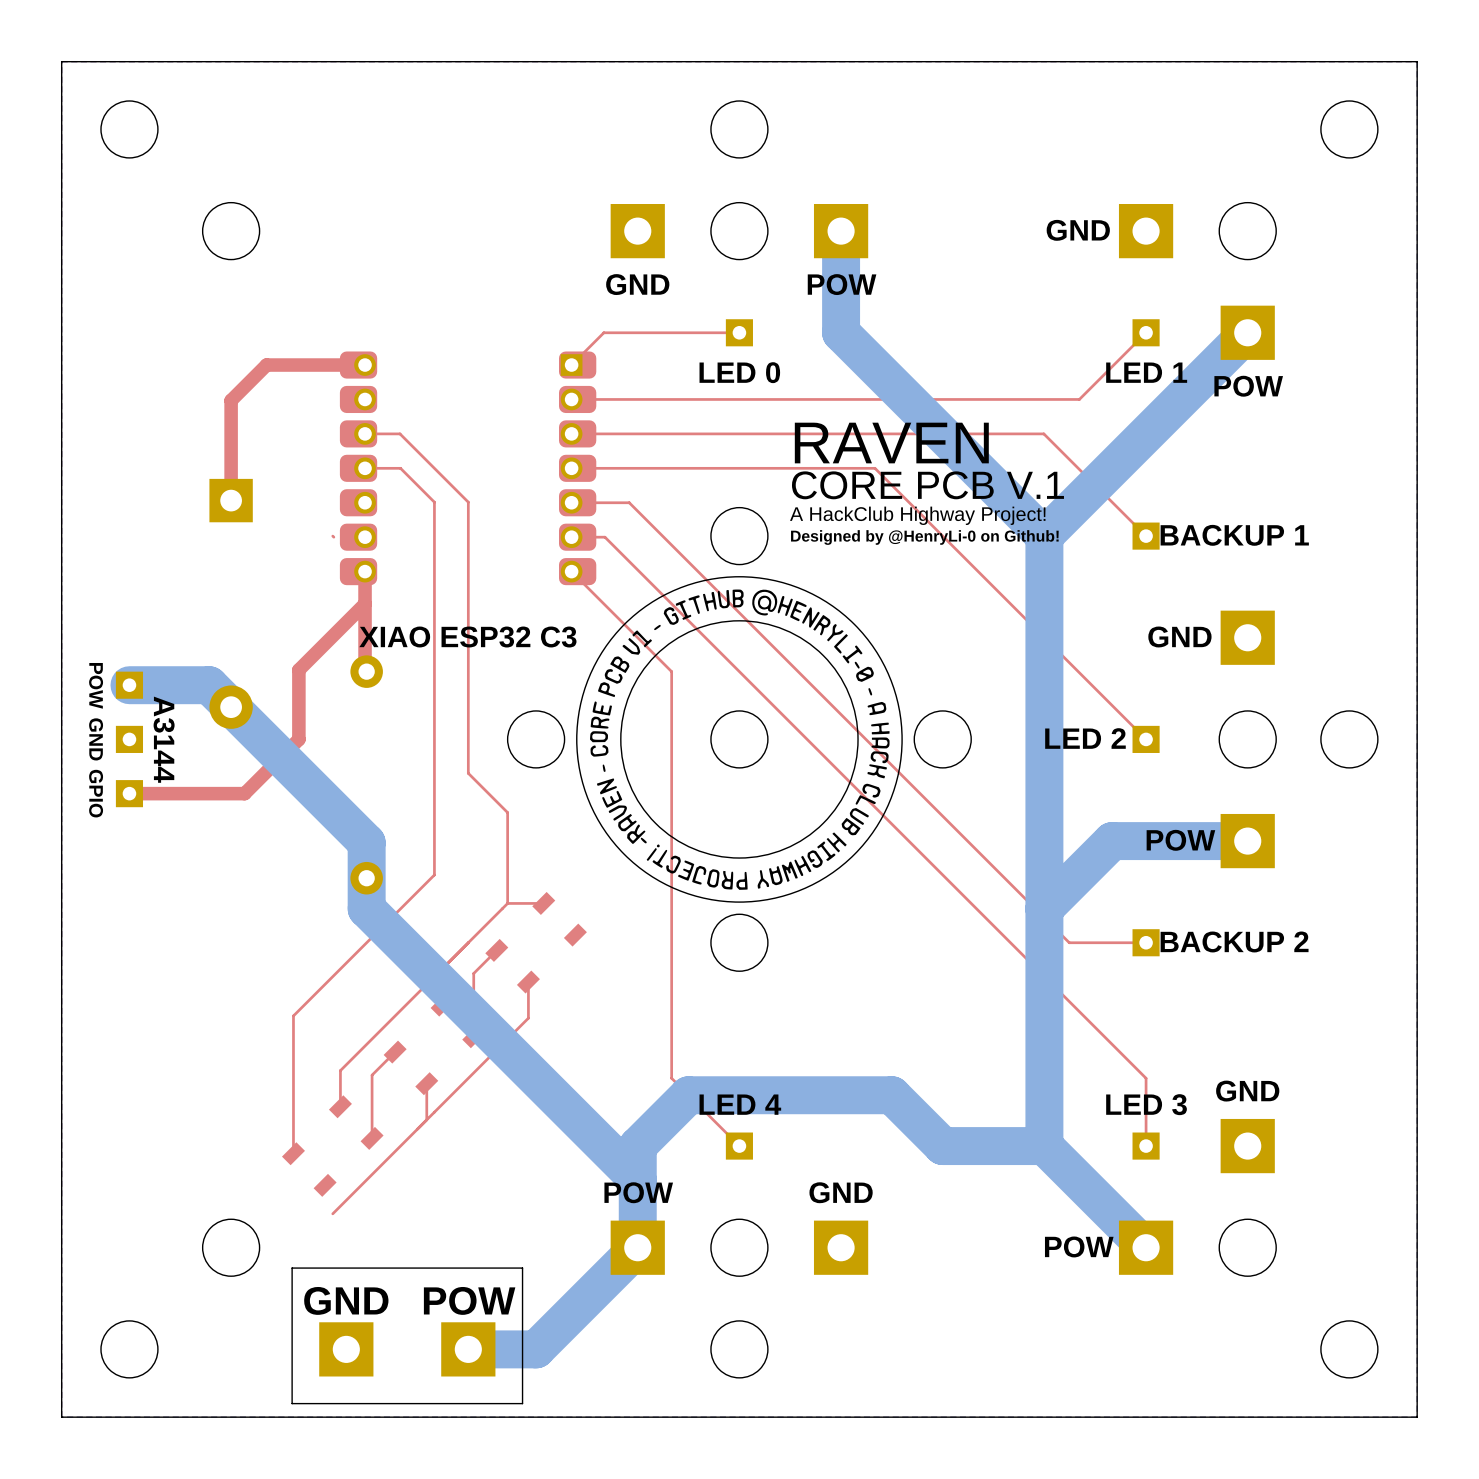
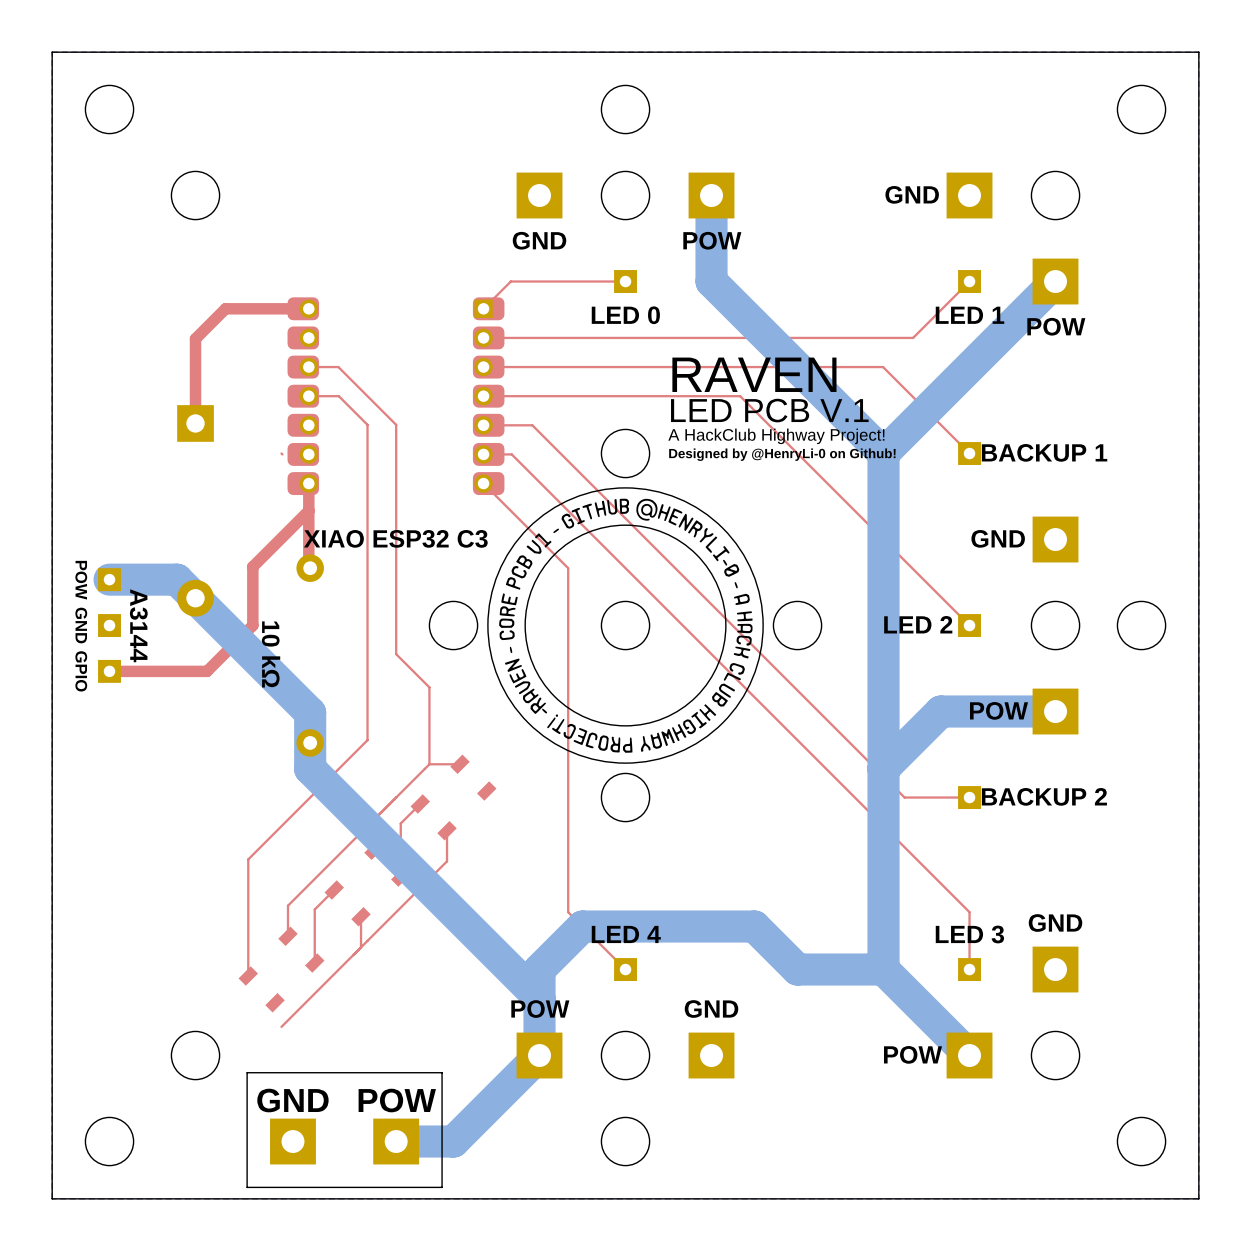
text: CORE PCB V.1 (927, 485) -> LED PCB V.1 (769, 410)
text: none -> 10 kΩ (271, 654)

